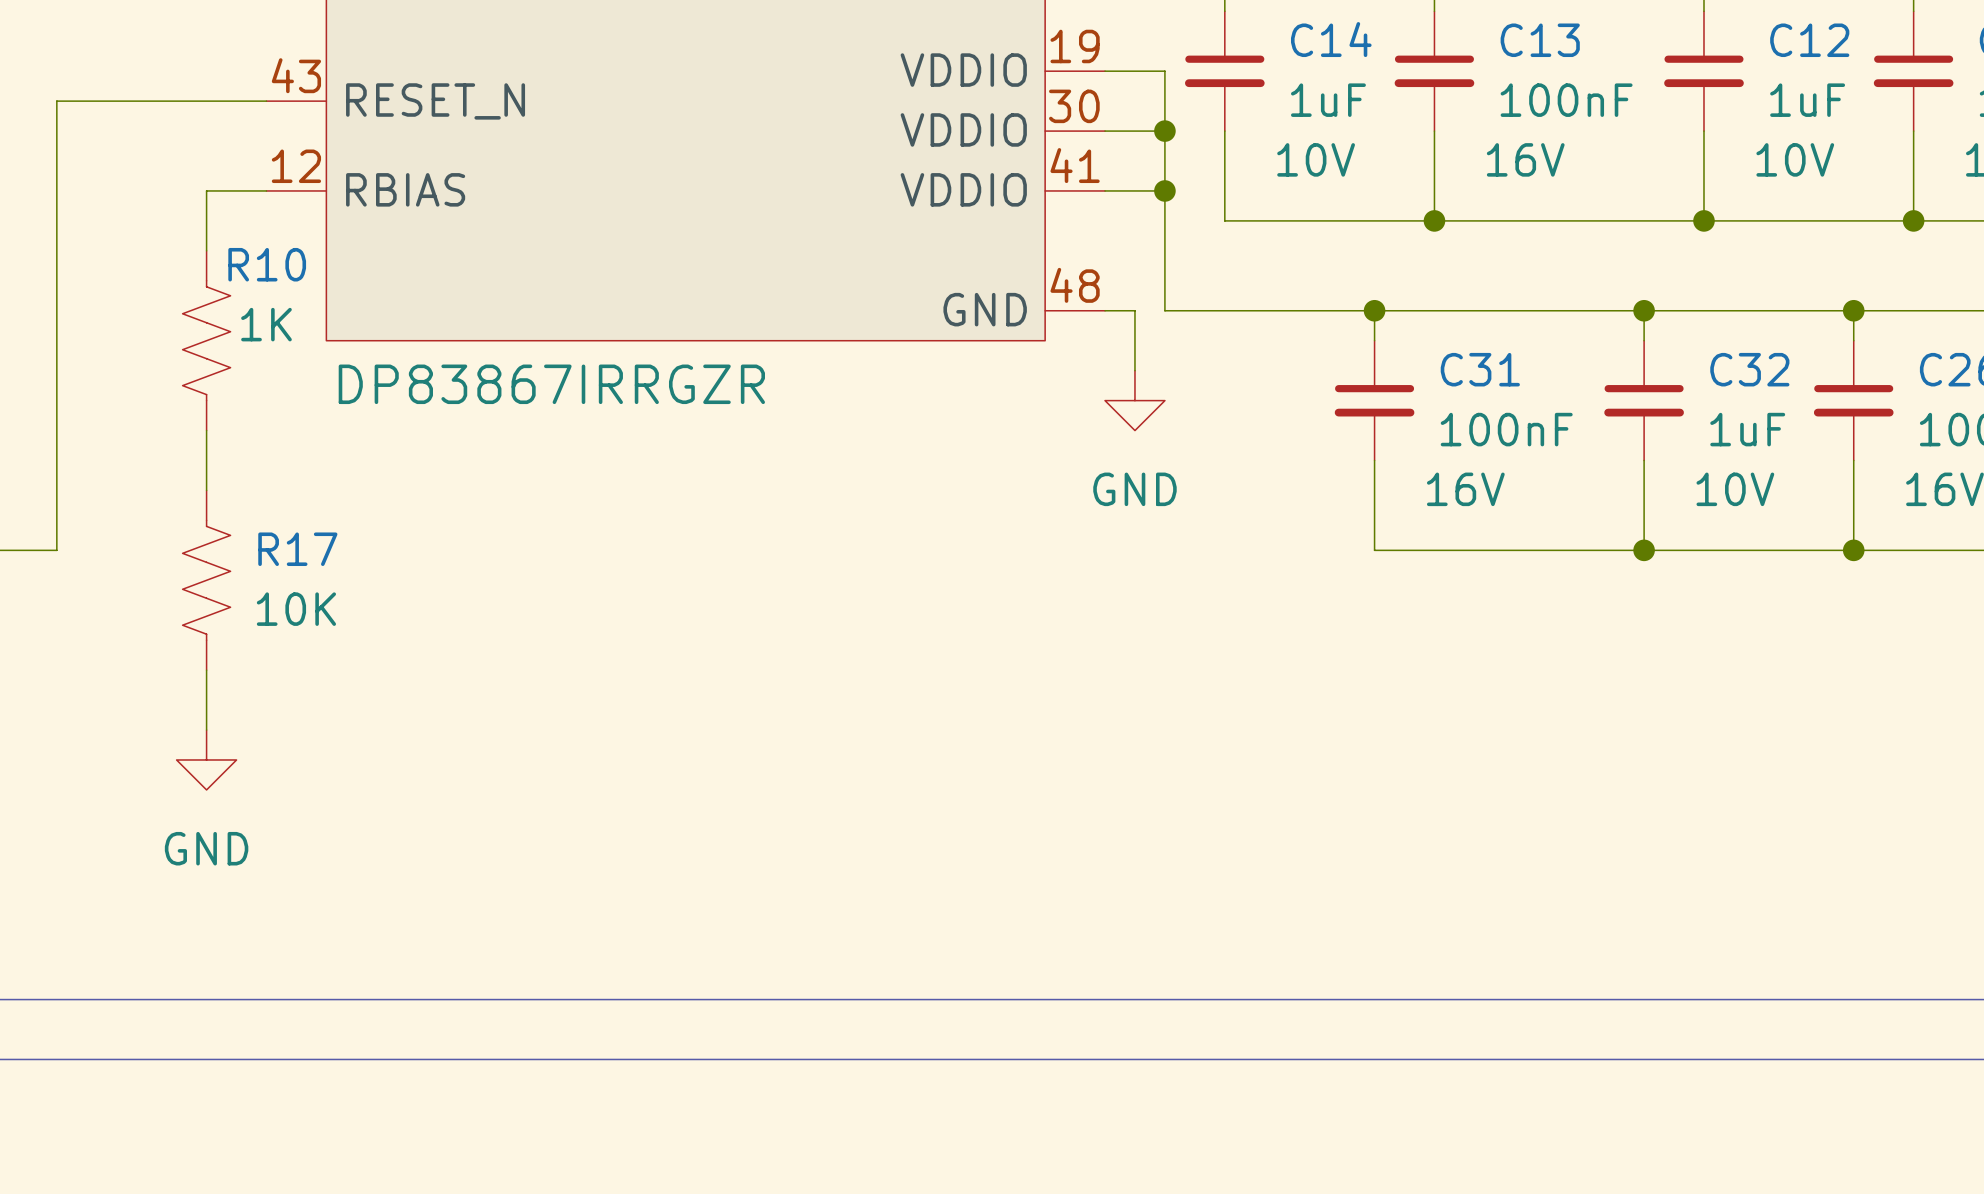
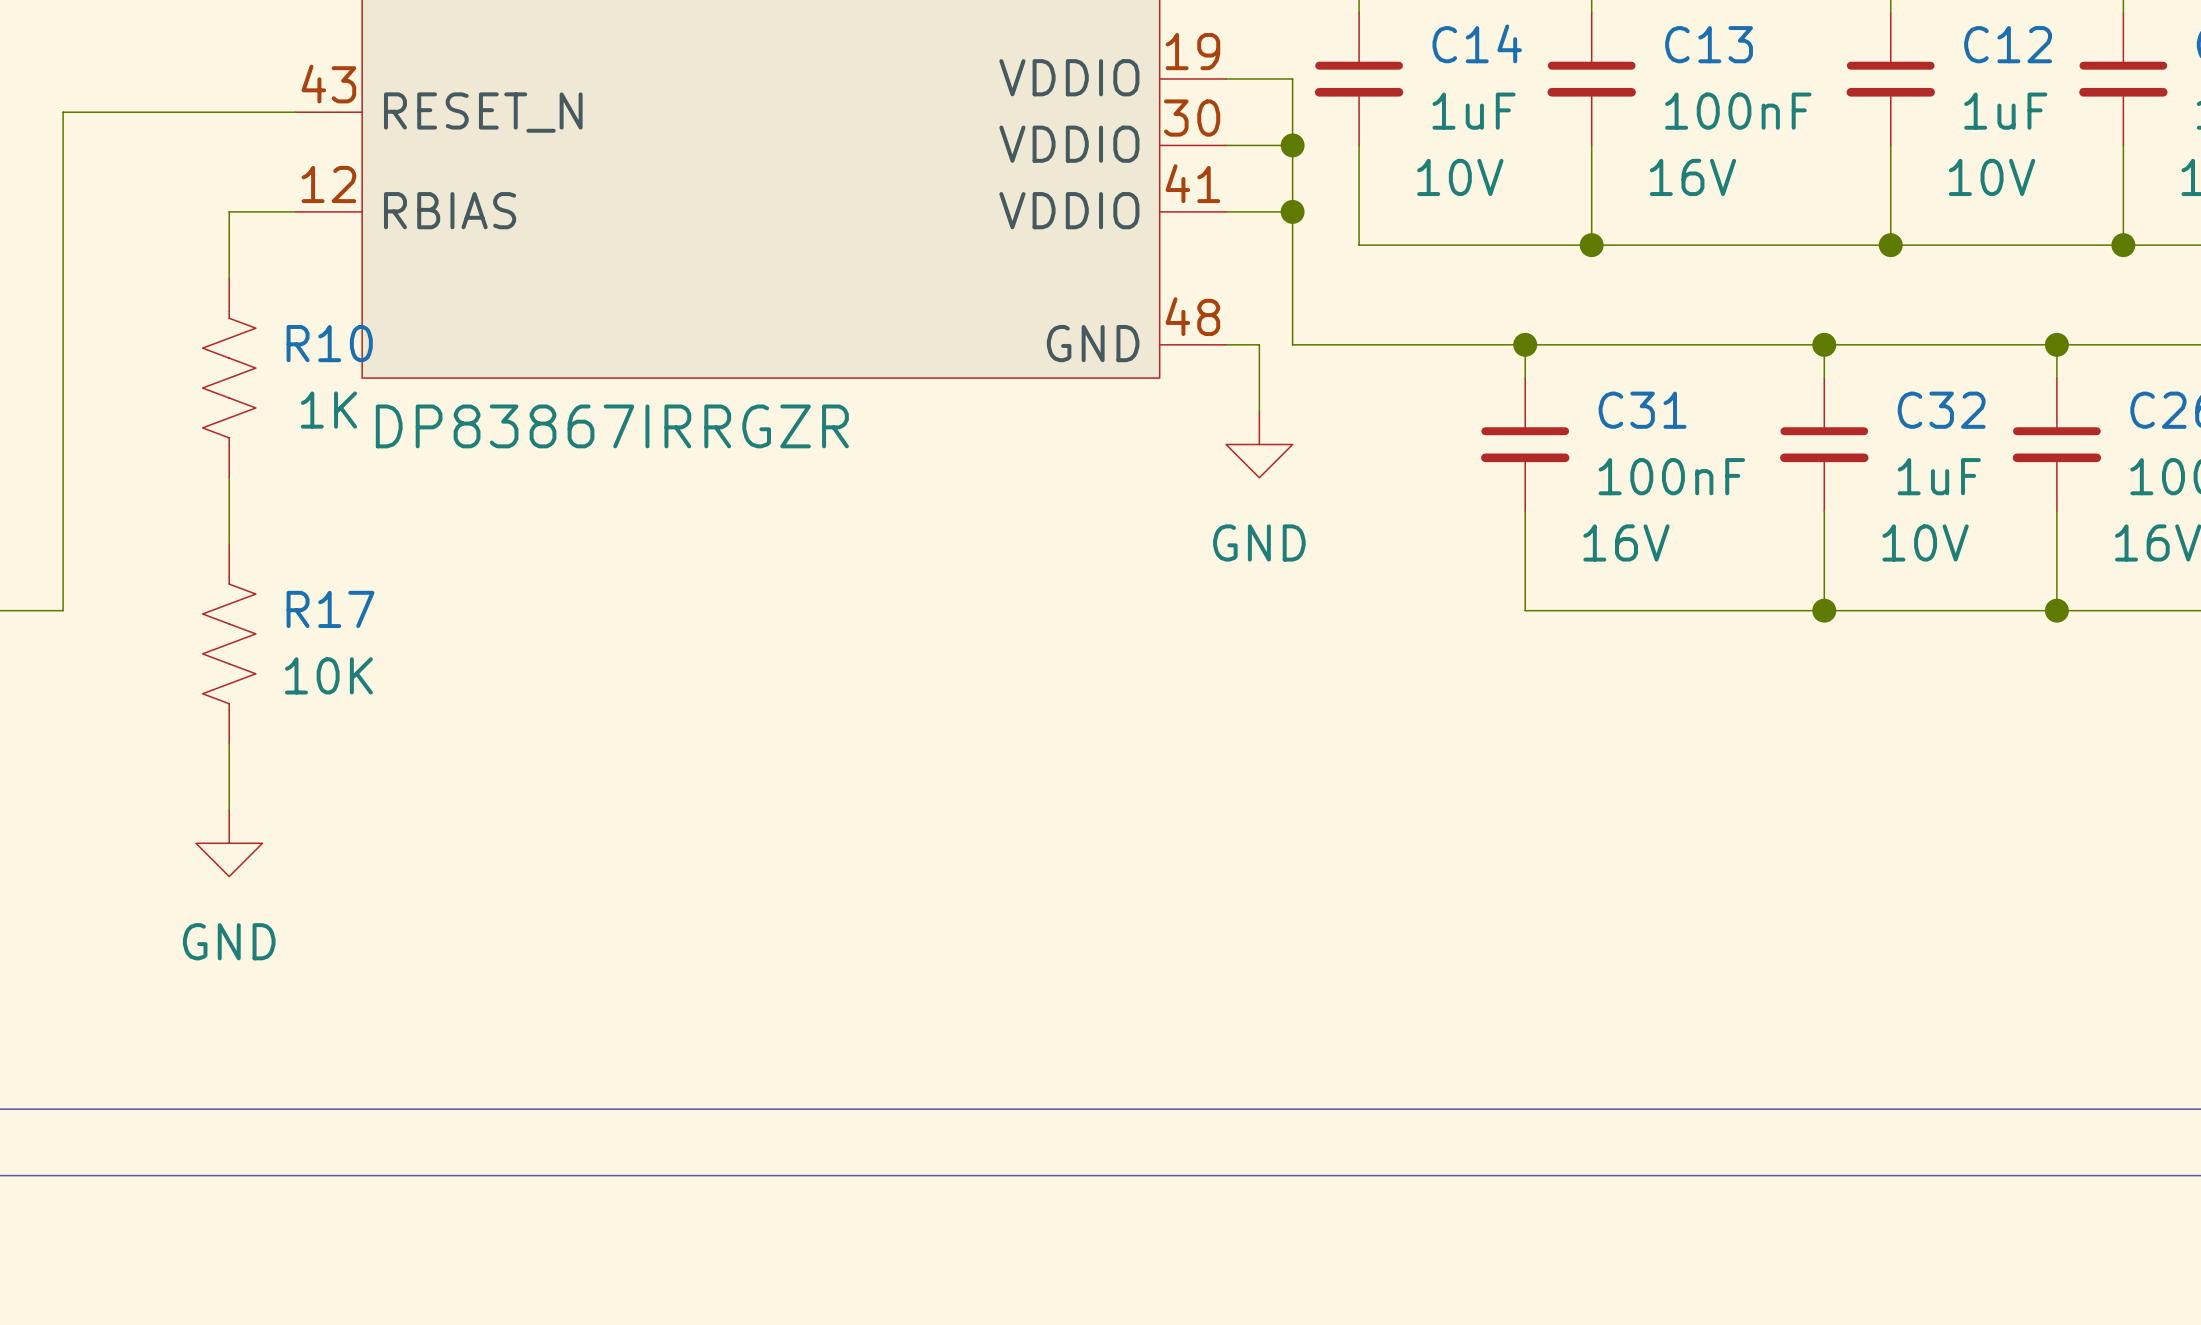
R10 name position: R10 (267, 264) -> R10 (329, 343)
R10 value position: 1K (266, 324) -> 1K (328, 410)

